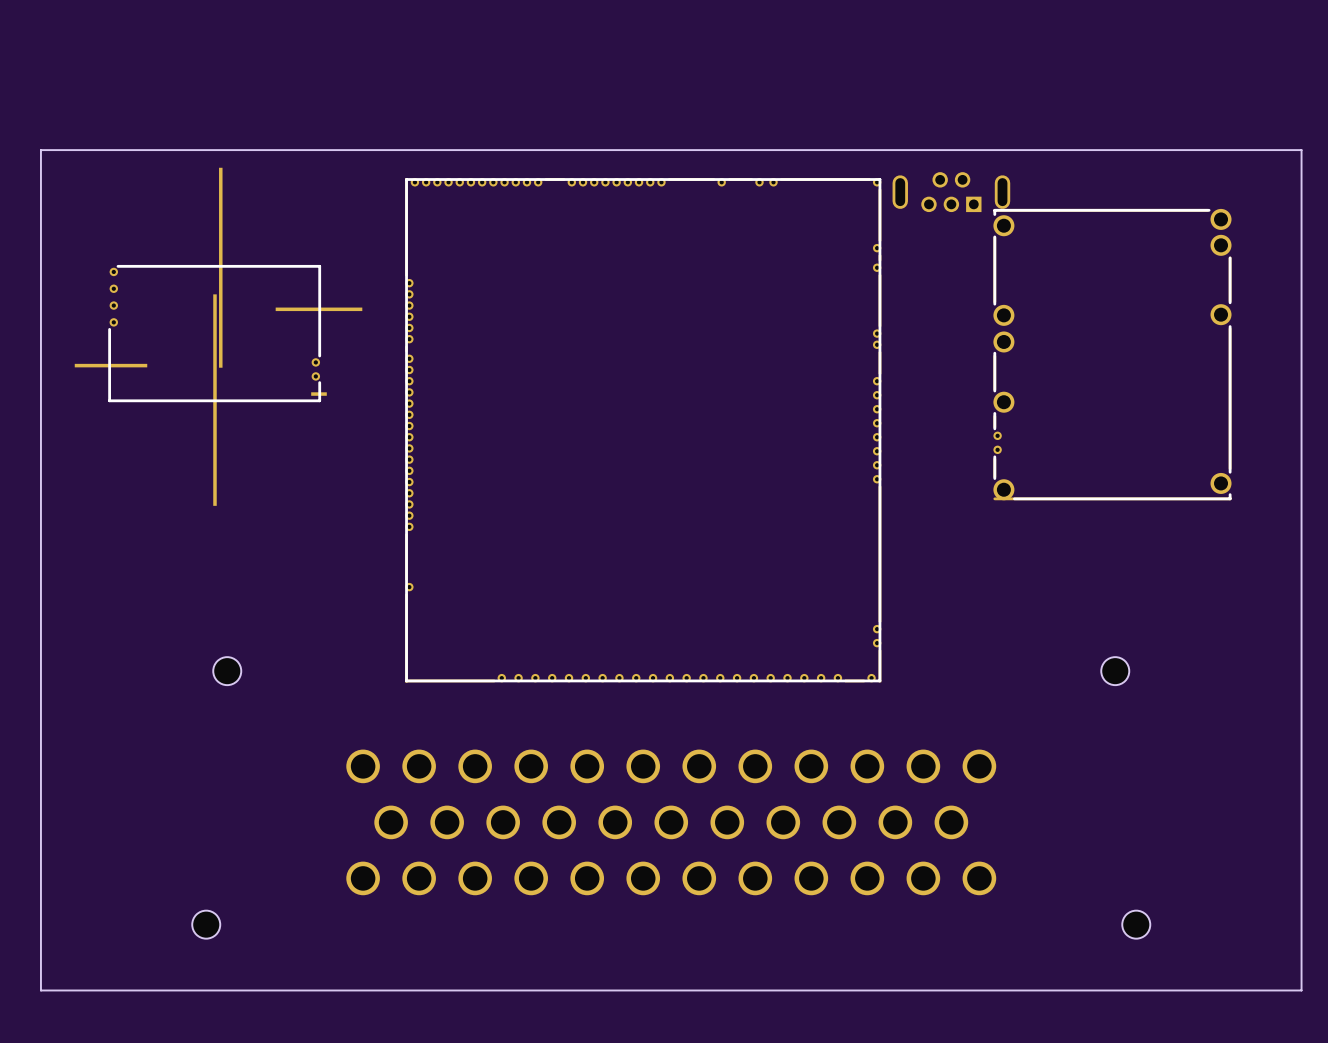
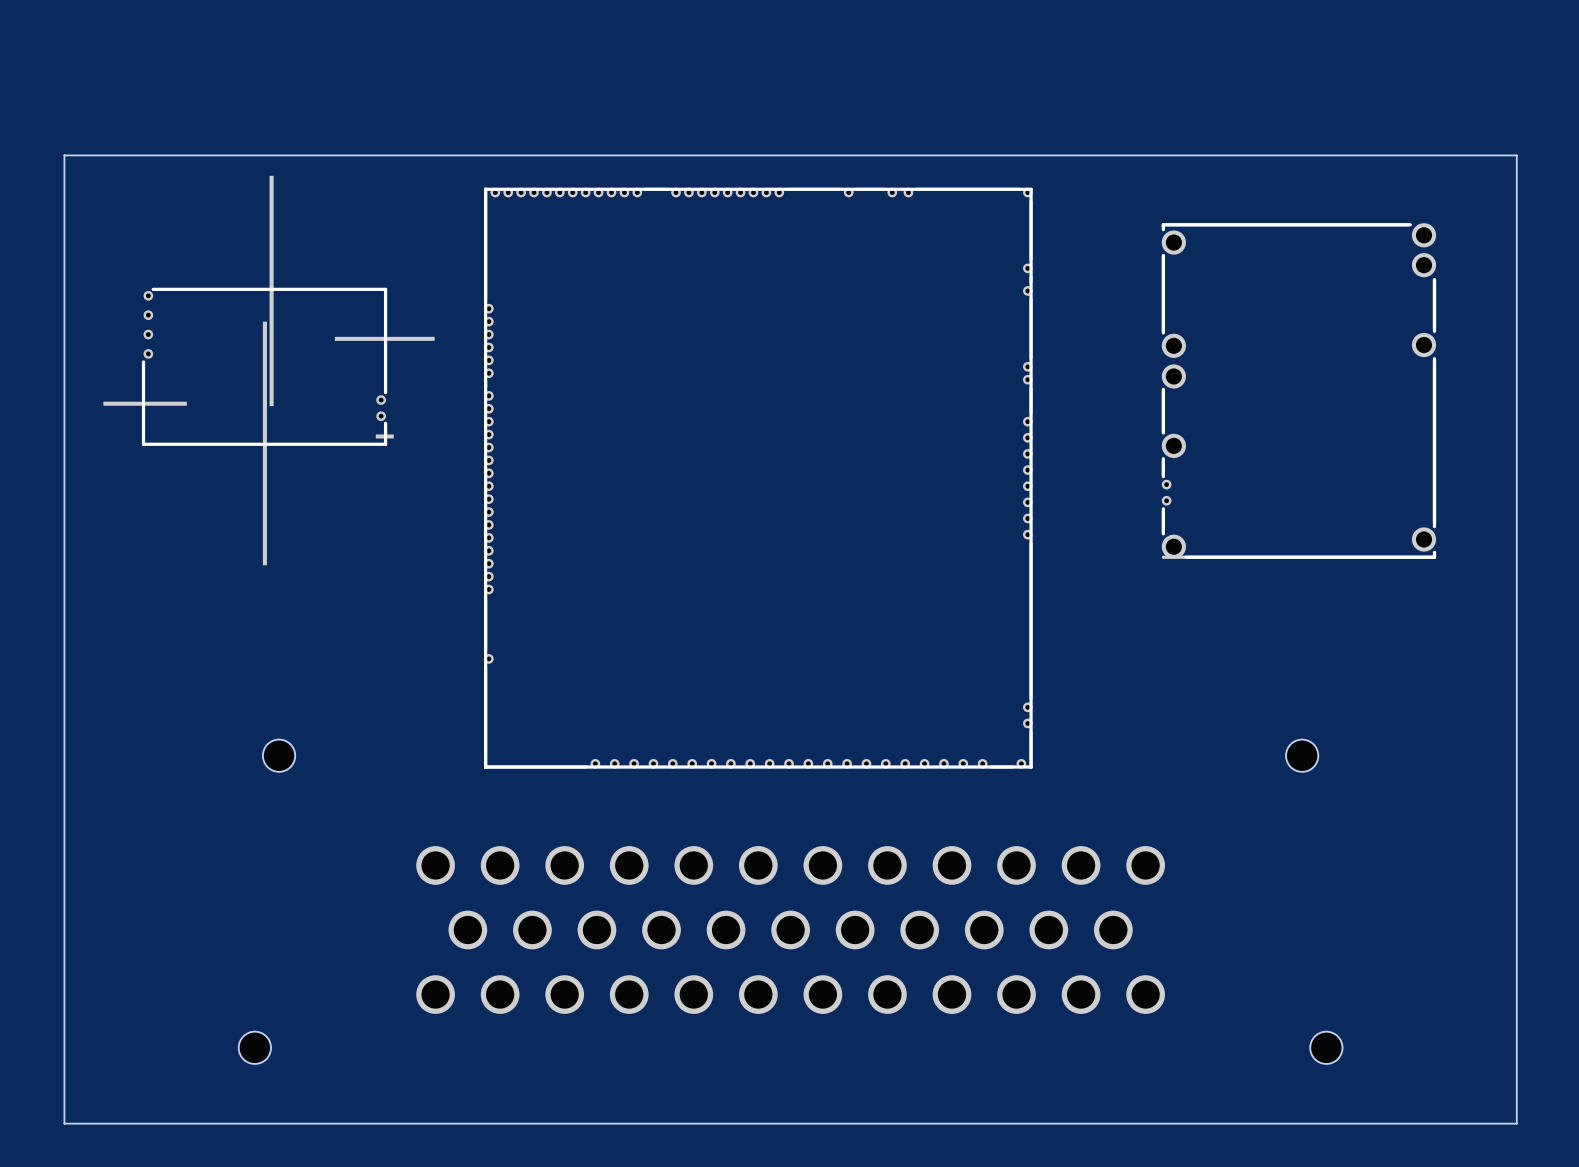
part: (951, 192) -> none

